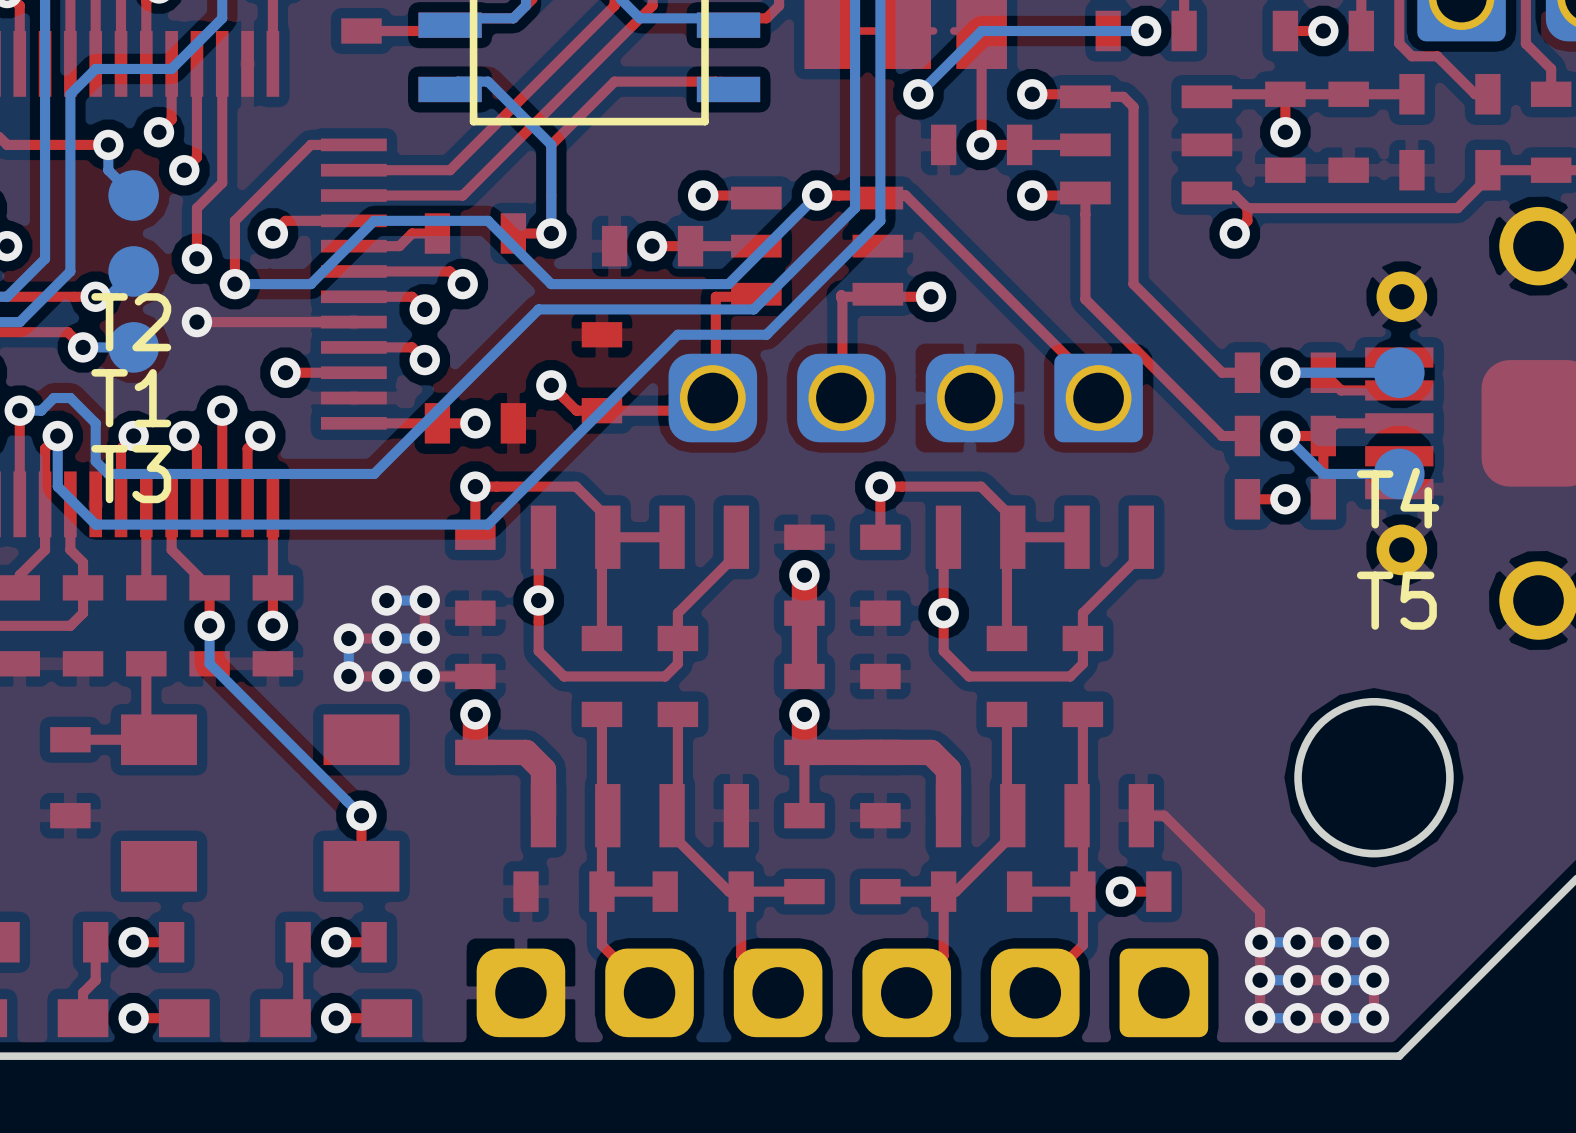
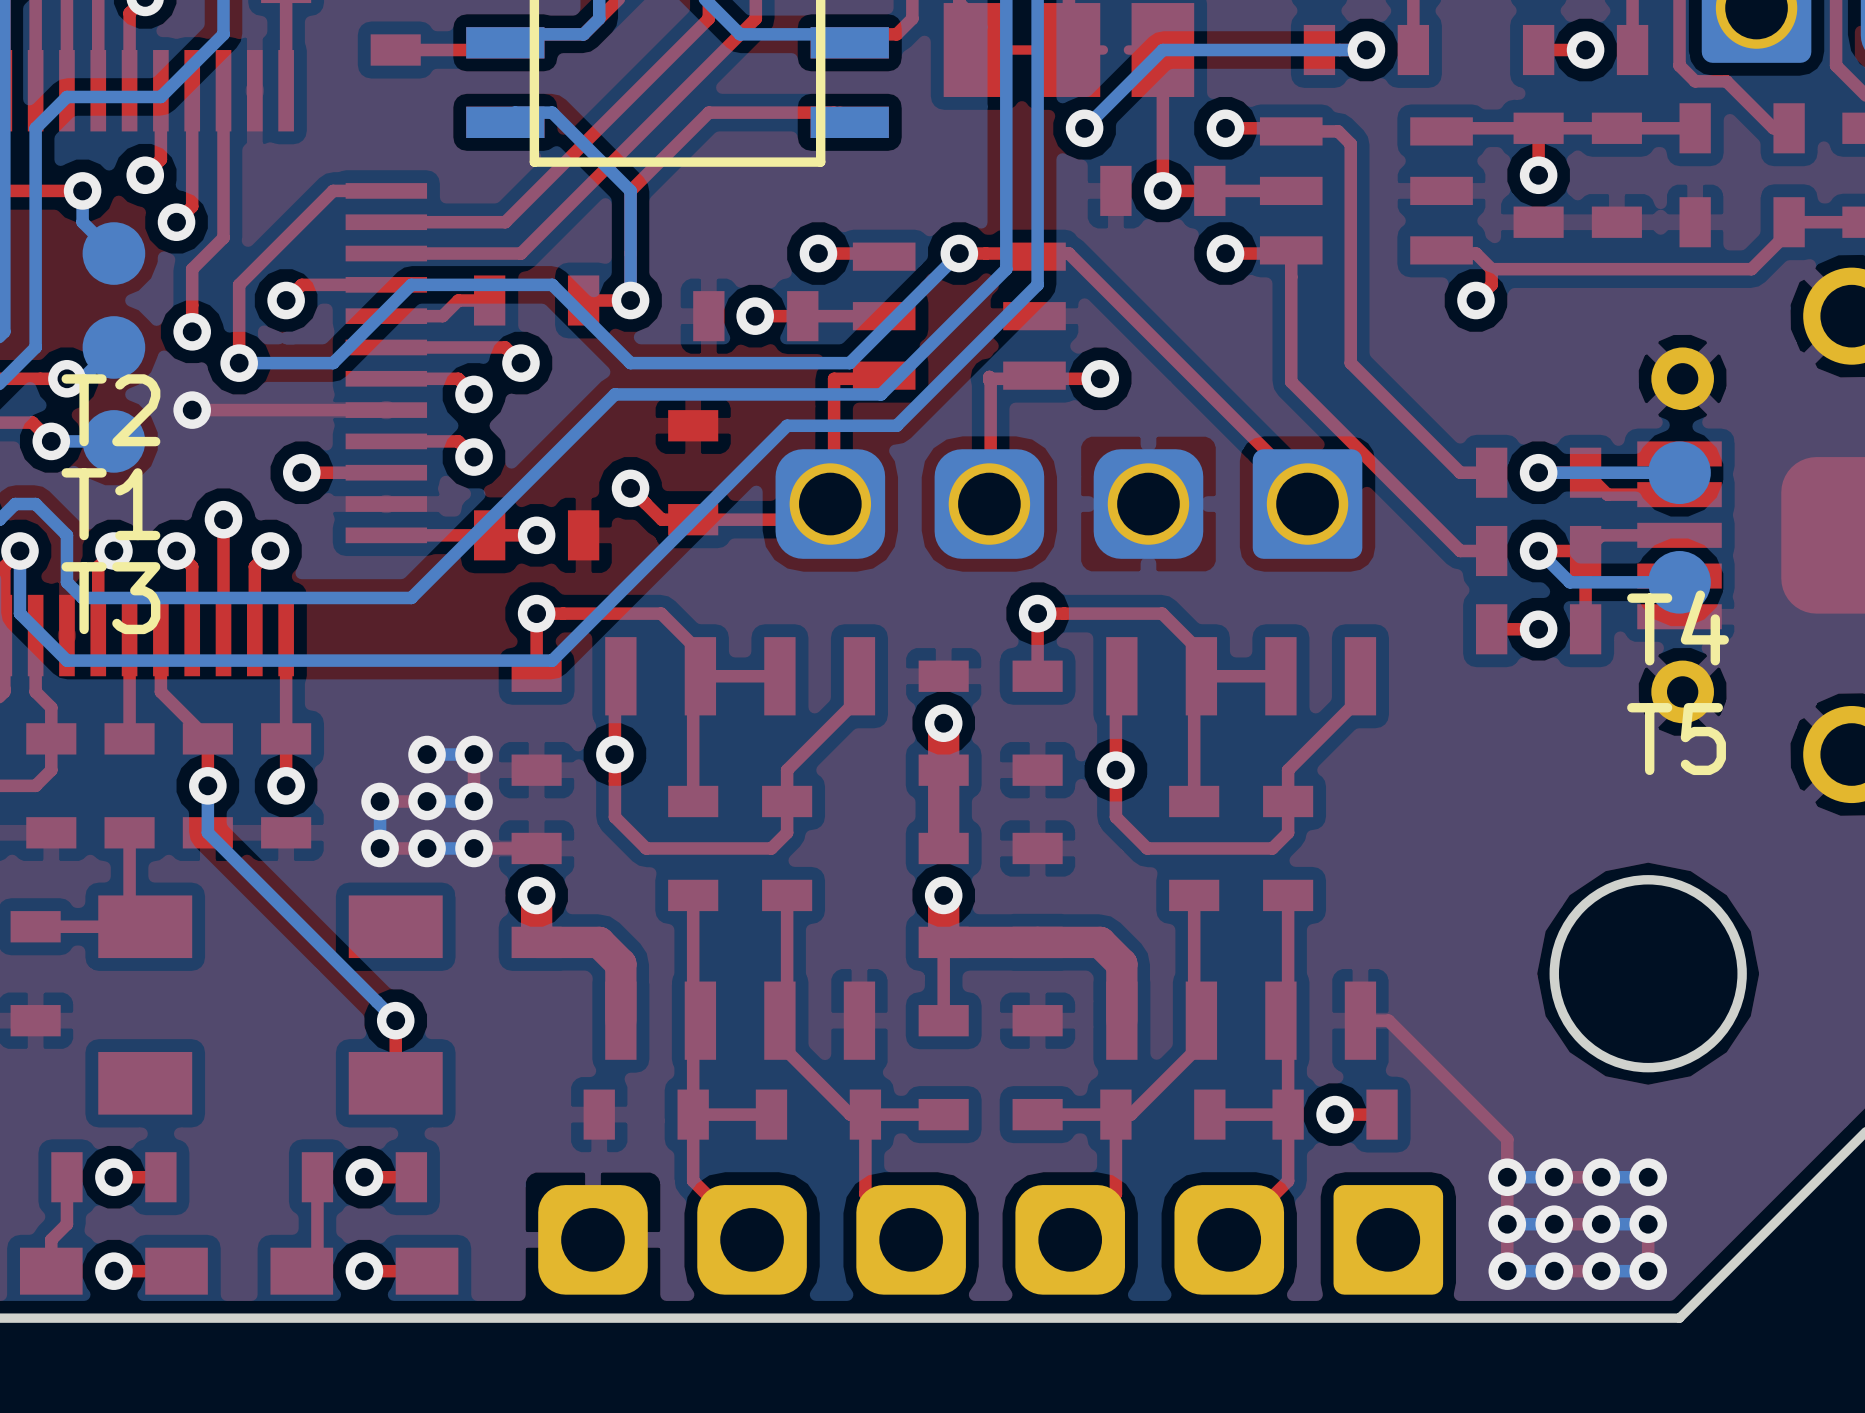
bottom track: (1399, 461) (1386, 473) (1323, 473) (1310, 461) -> (1679, 582) (1569, 582)
T5 position: (1399, 473) -> (1679, 582)

